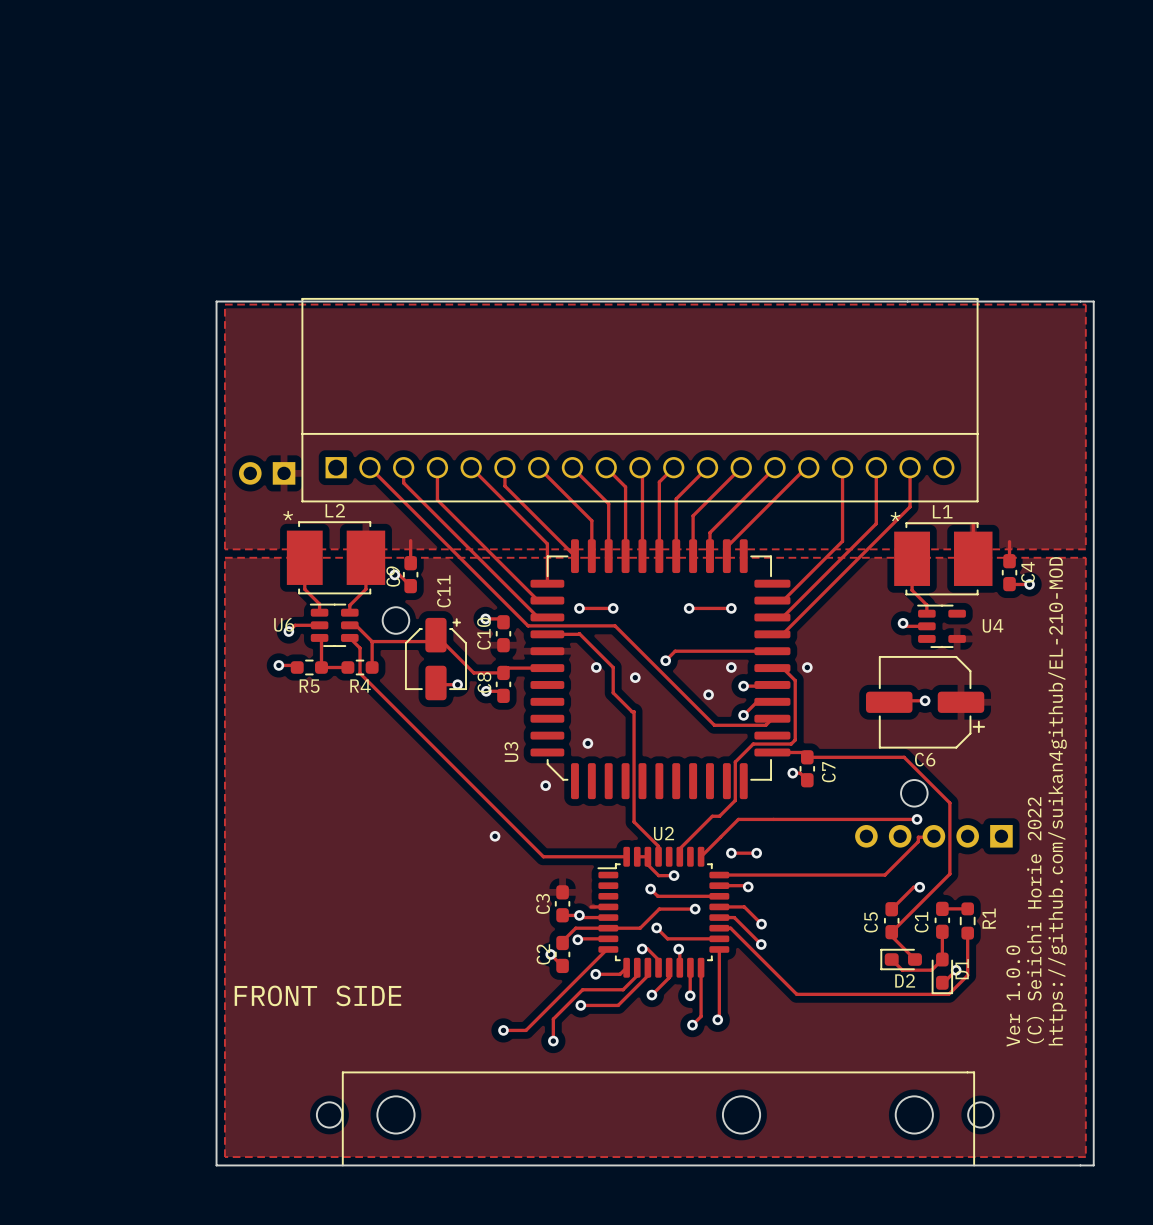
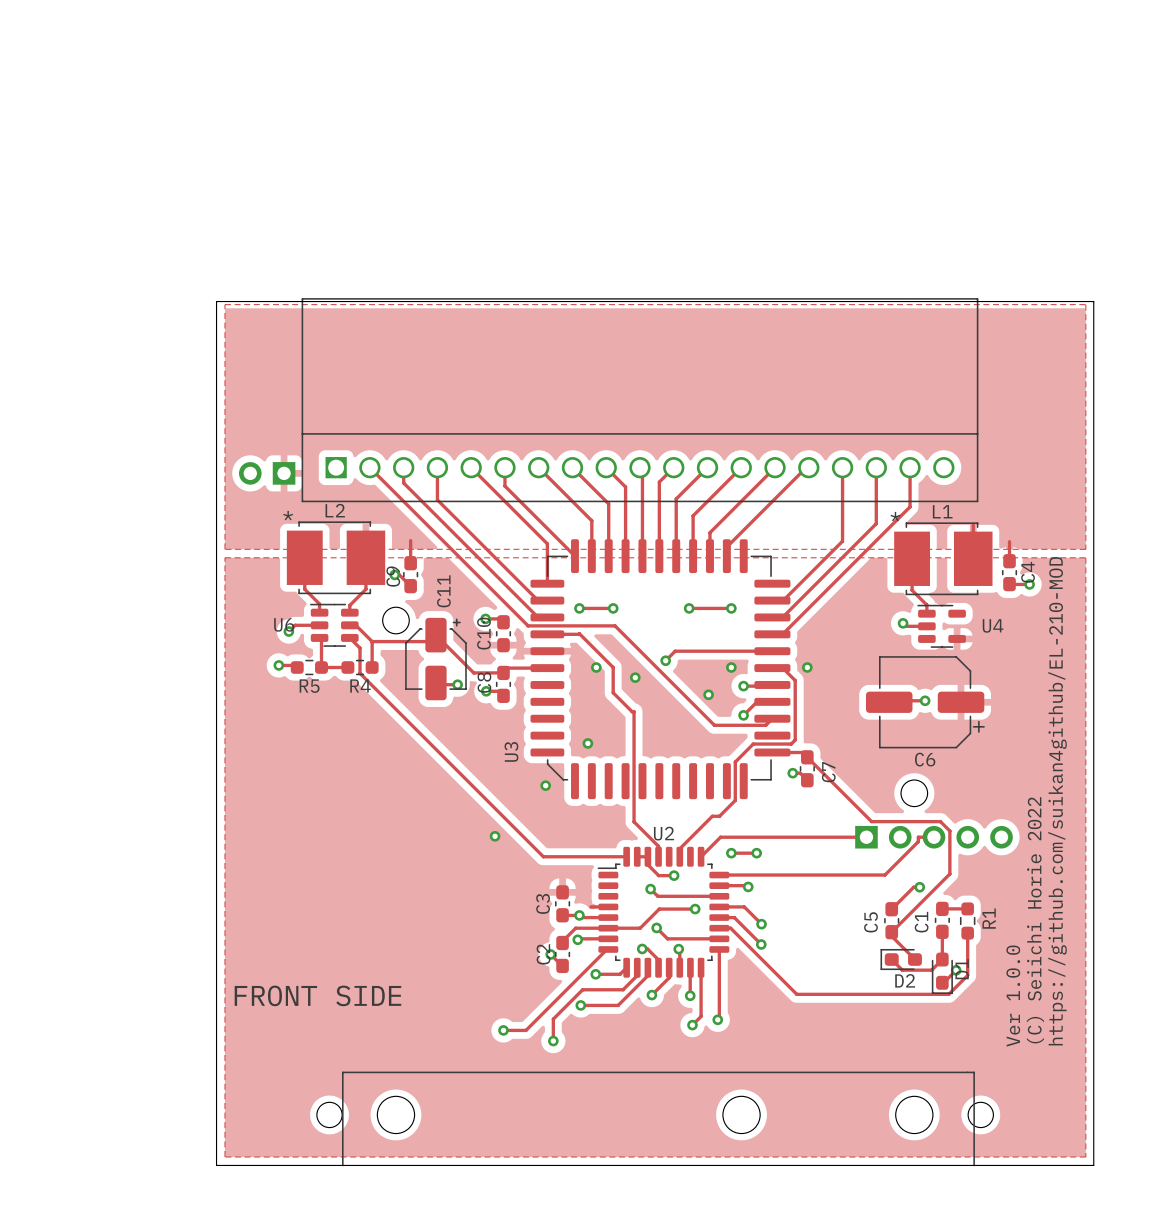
track: (807, 757) (904, 757) (949, 803) (949, 831) -> (807, 757) (871, 821) (940, 821) (949, 831)
track: (917, 819) (738, 819) (720, 837) -> (866, 837) (720, 837)
via: (917, 819) -> none
part rotation: 0° (933, 836) -> 180° (933, 837)

